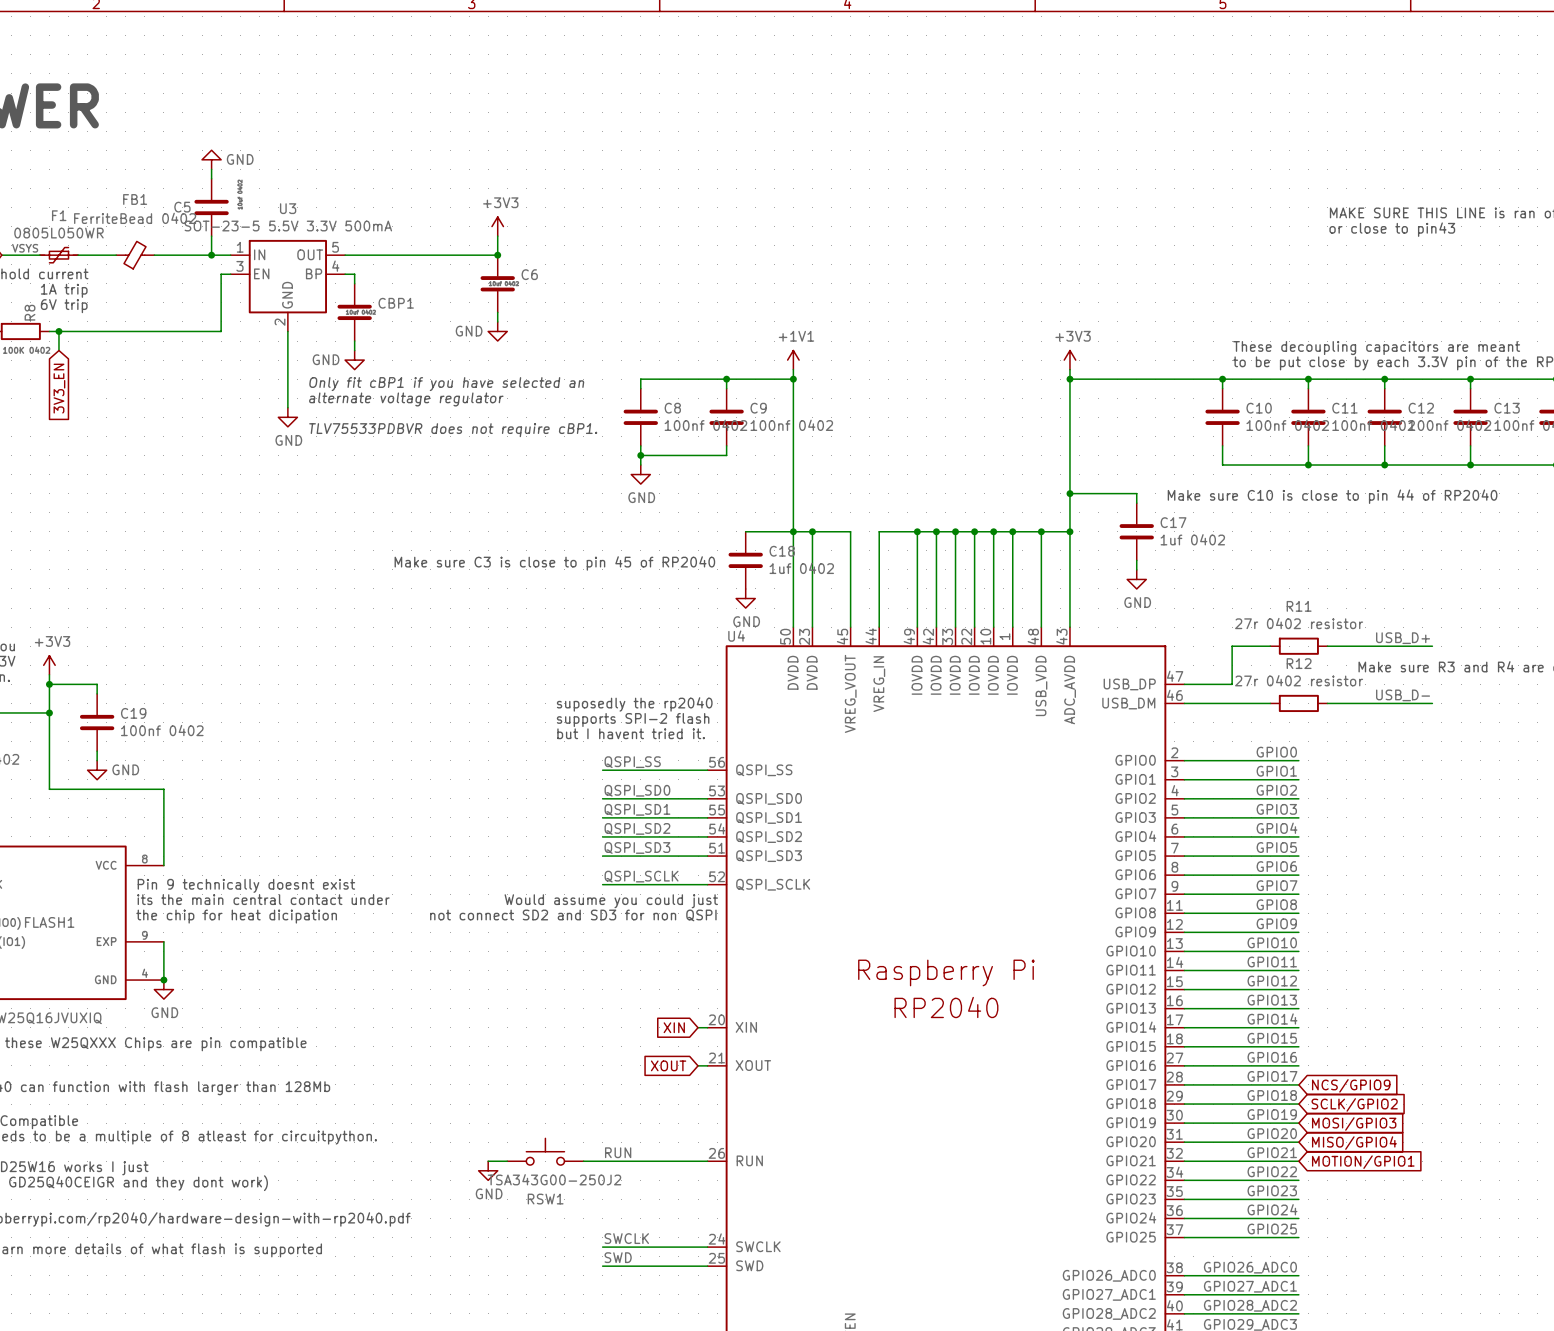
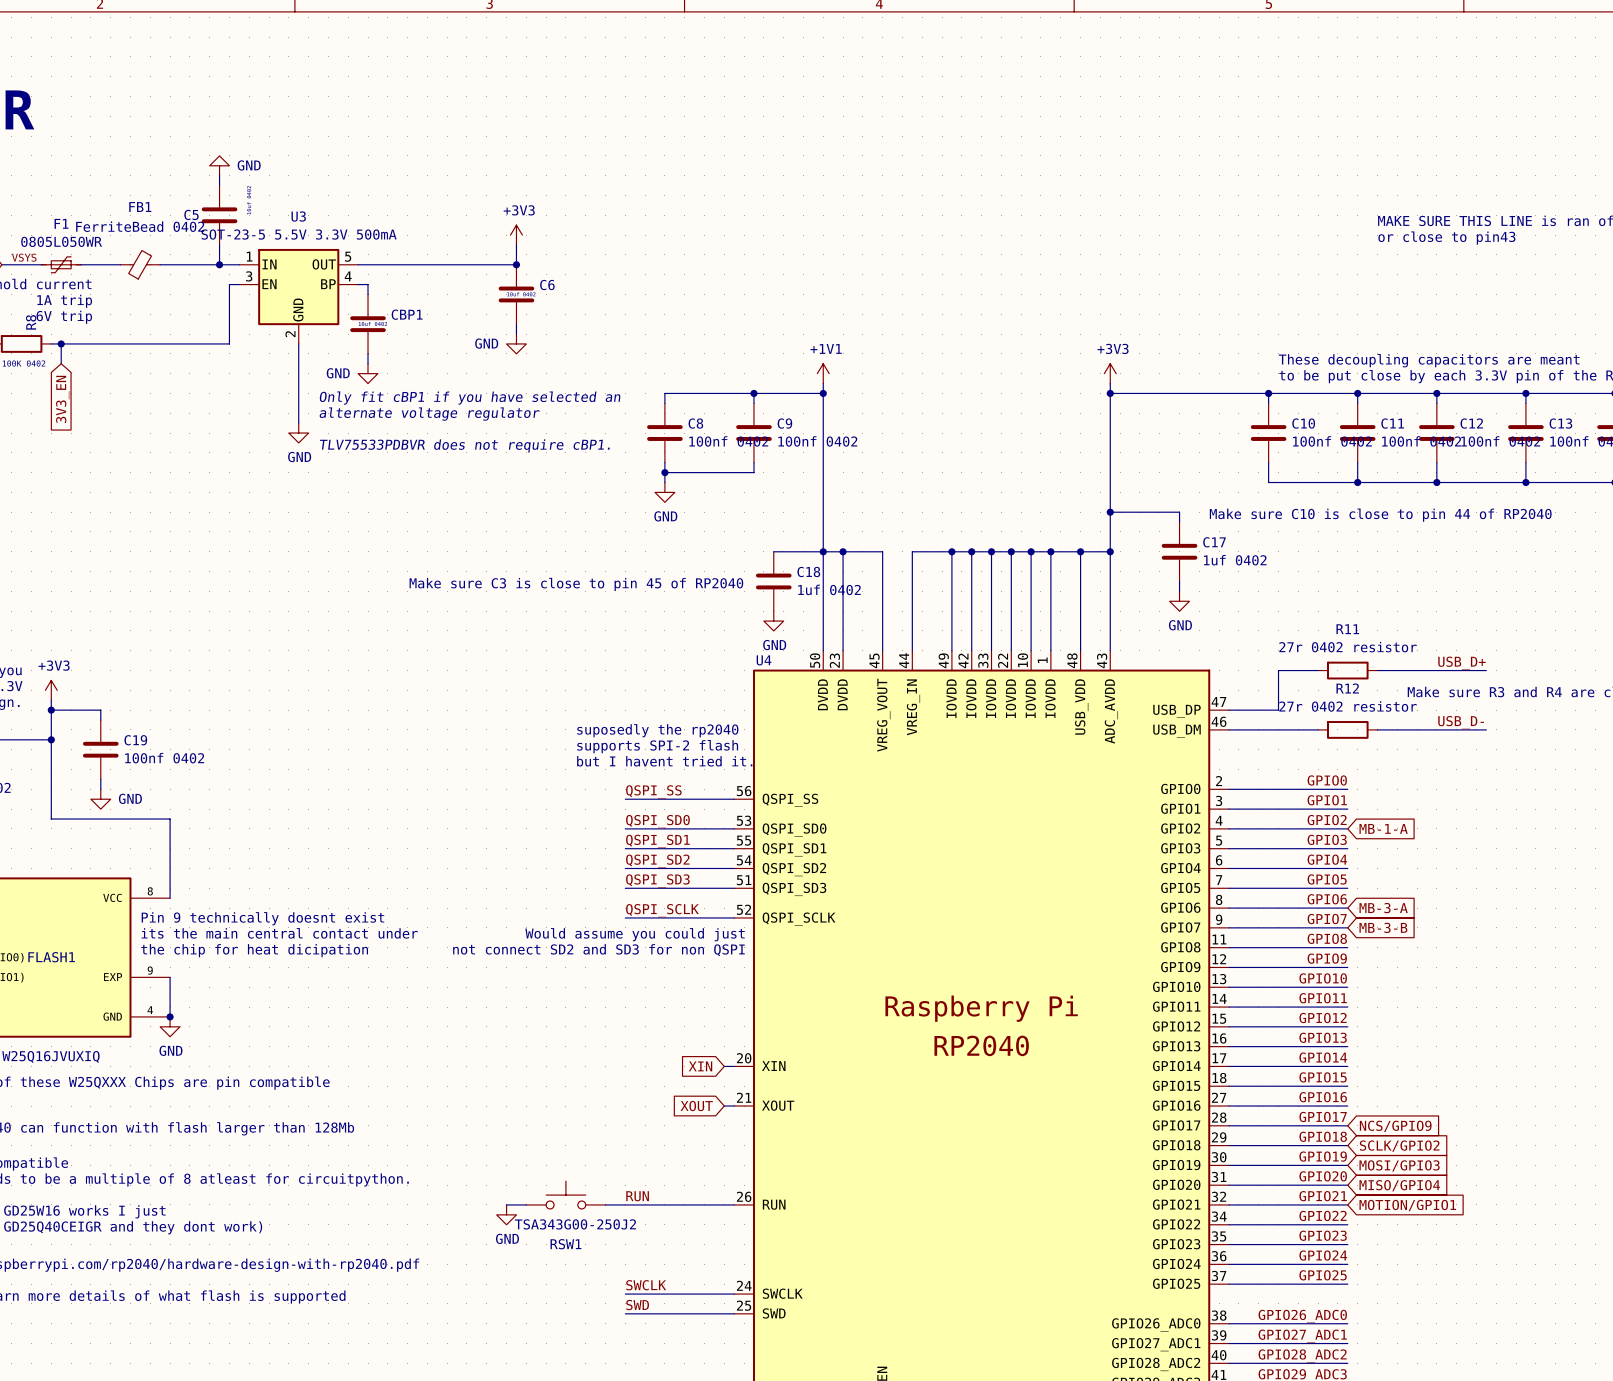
global label: none -> MB-1-A (1383, 828)
global label: none -> MB-3-A (1383, 908)
global label: none -> MB-3-B (1383, 927)

